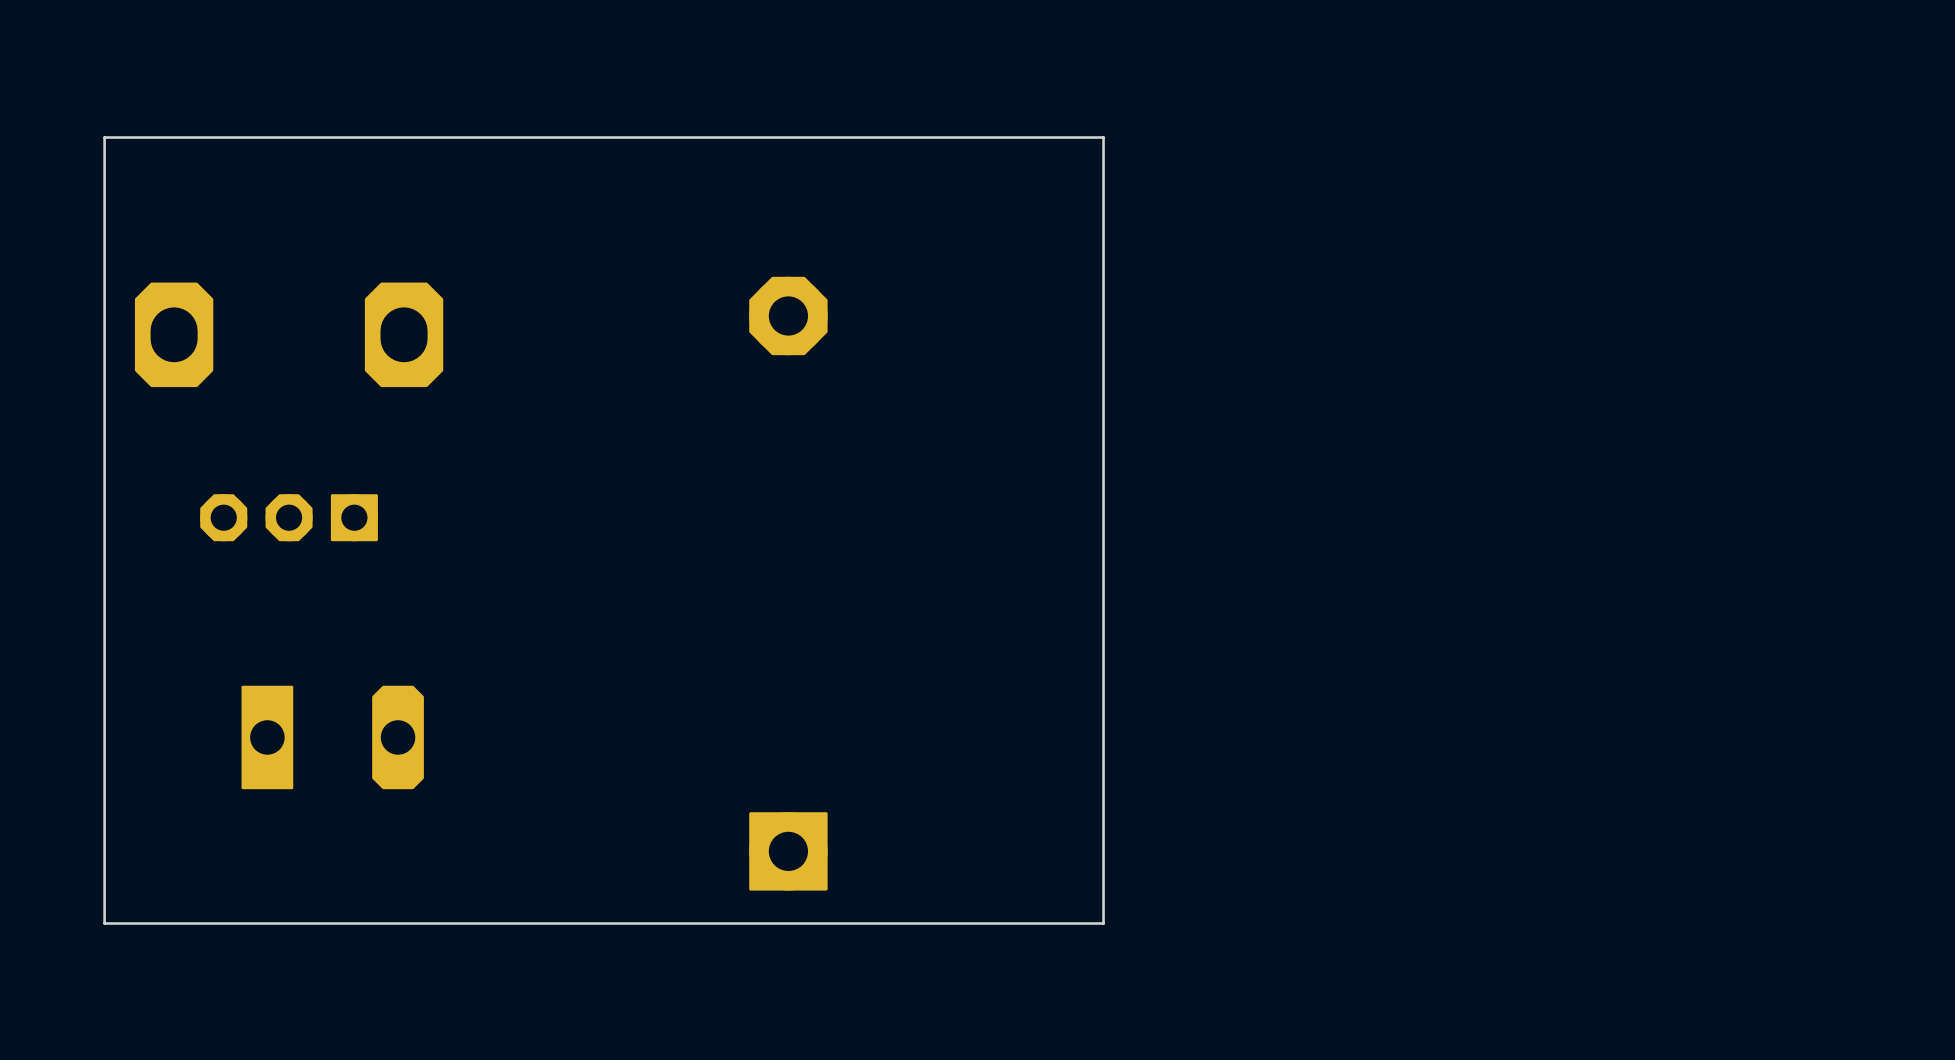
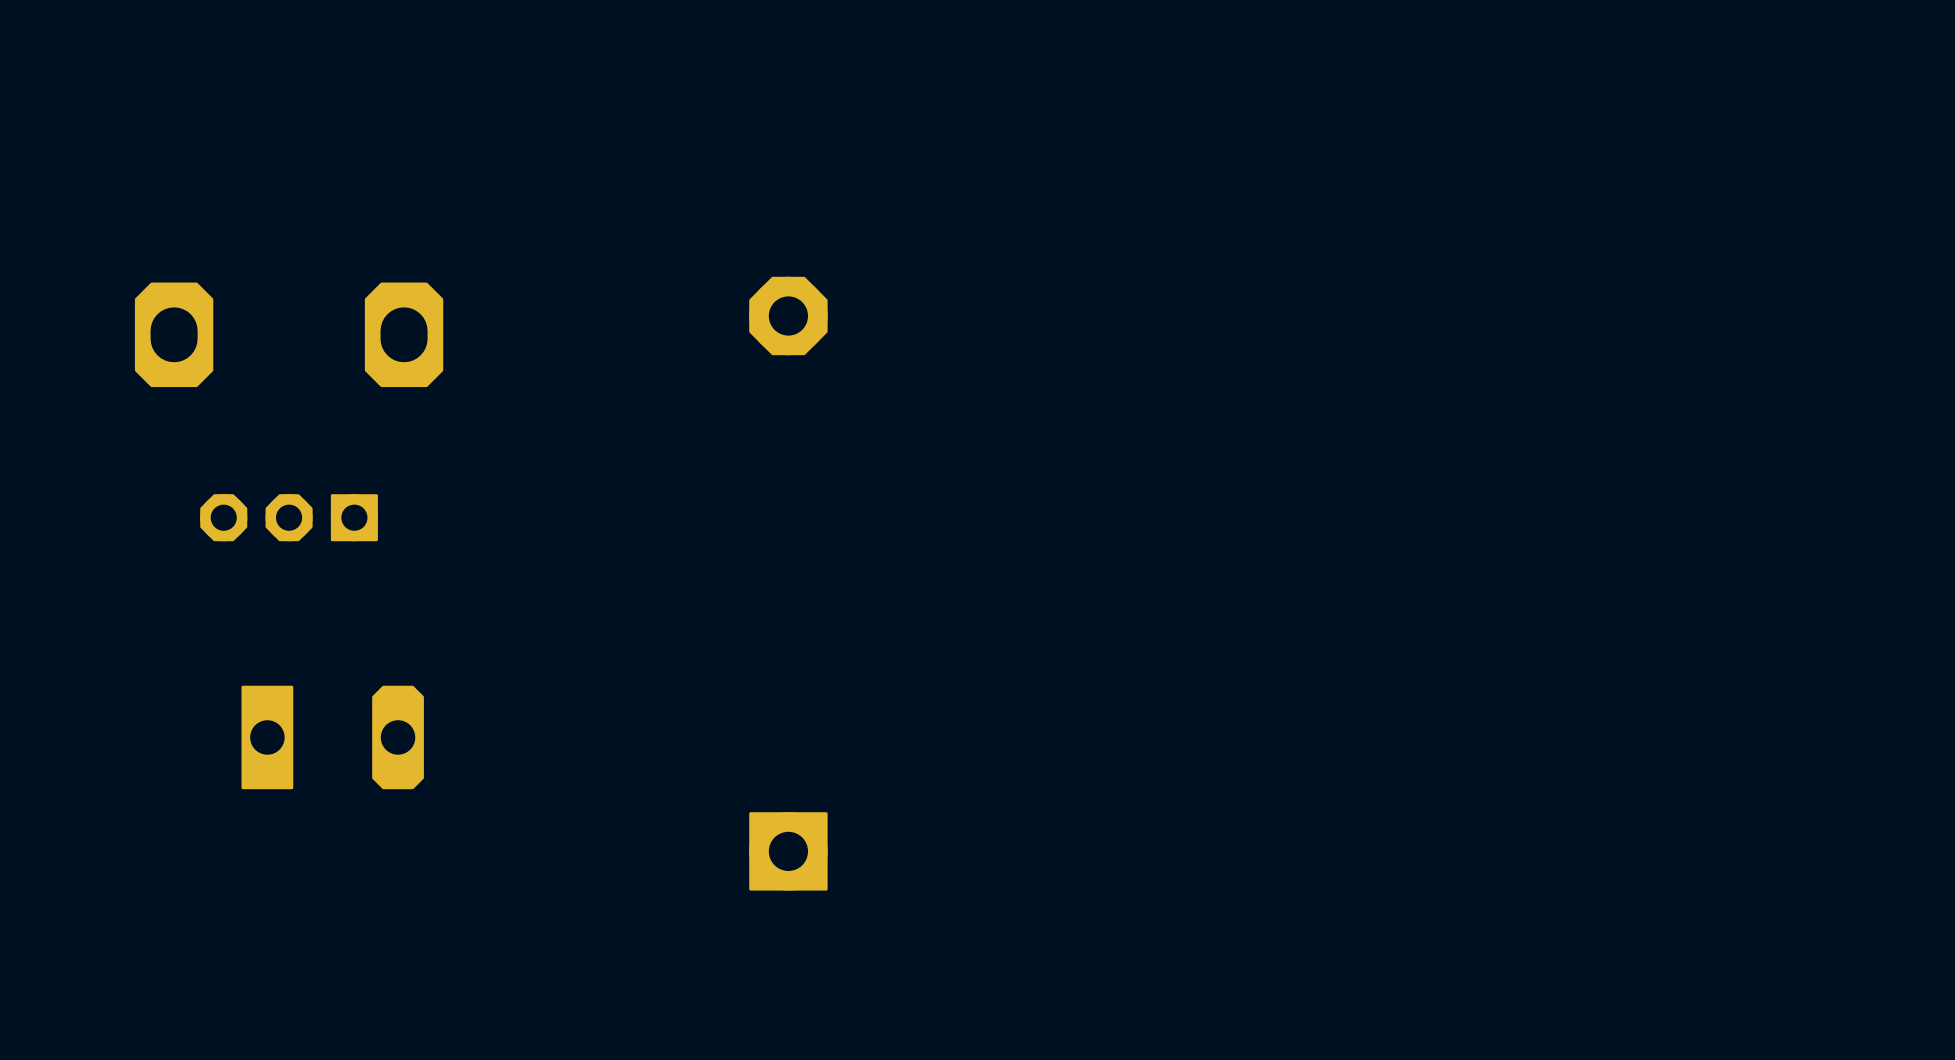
board edge: (1103, 137) (104, 137) (104, 923) (1103, 923) (1103, 137) -> none

